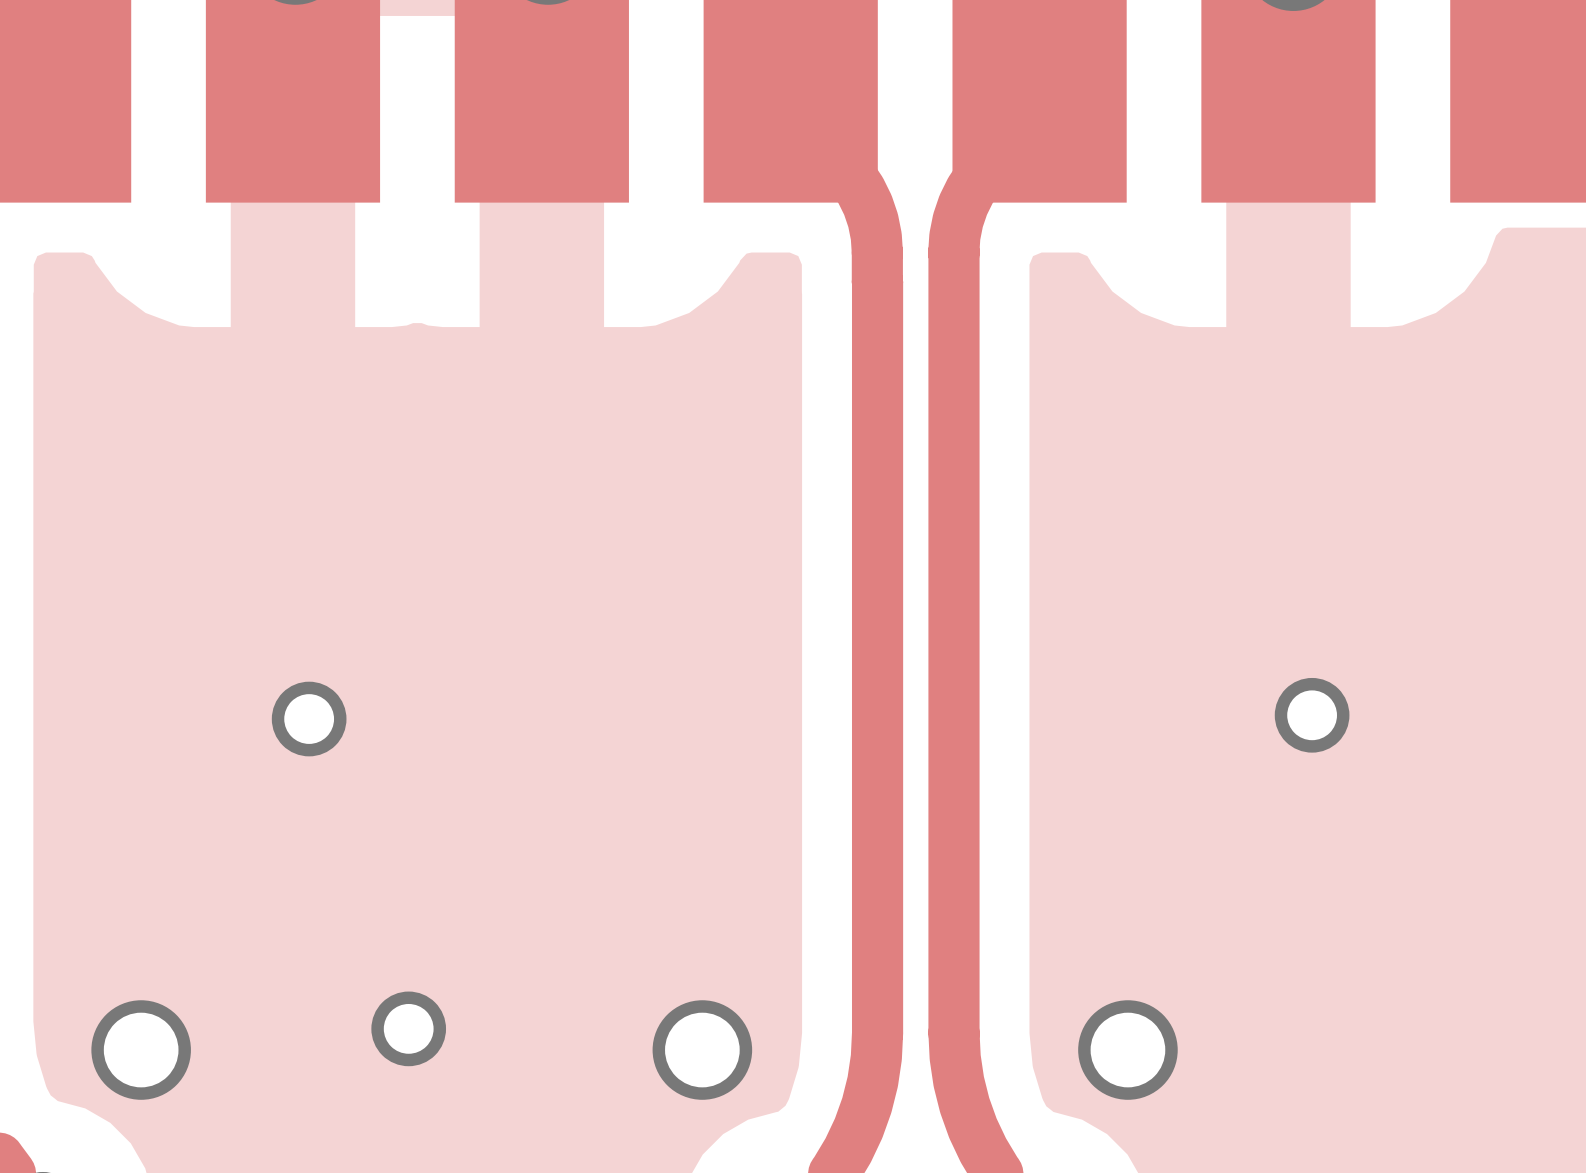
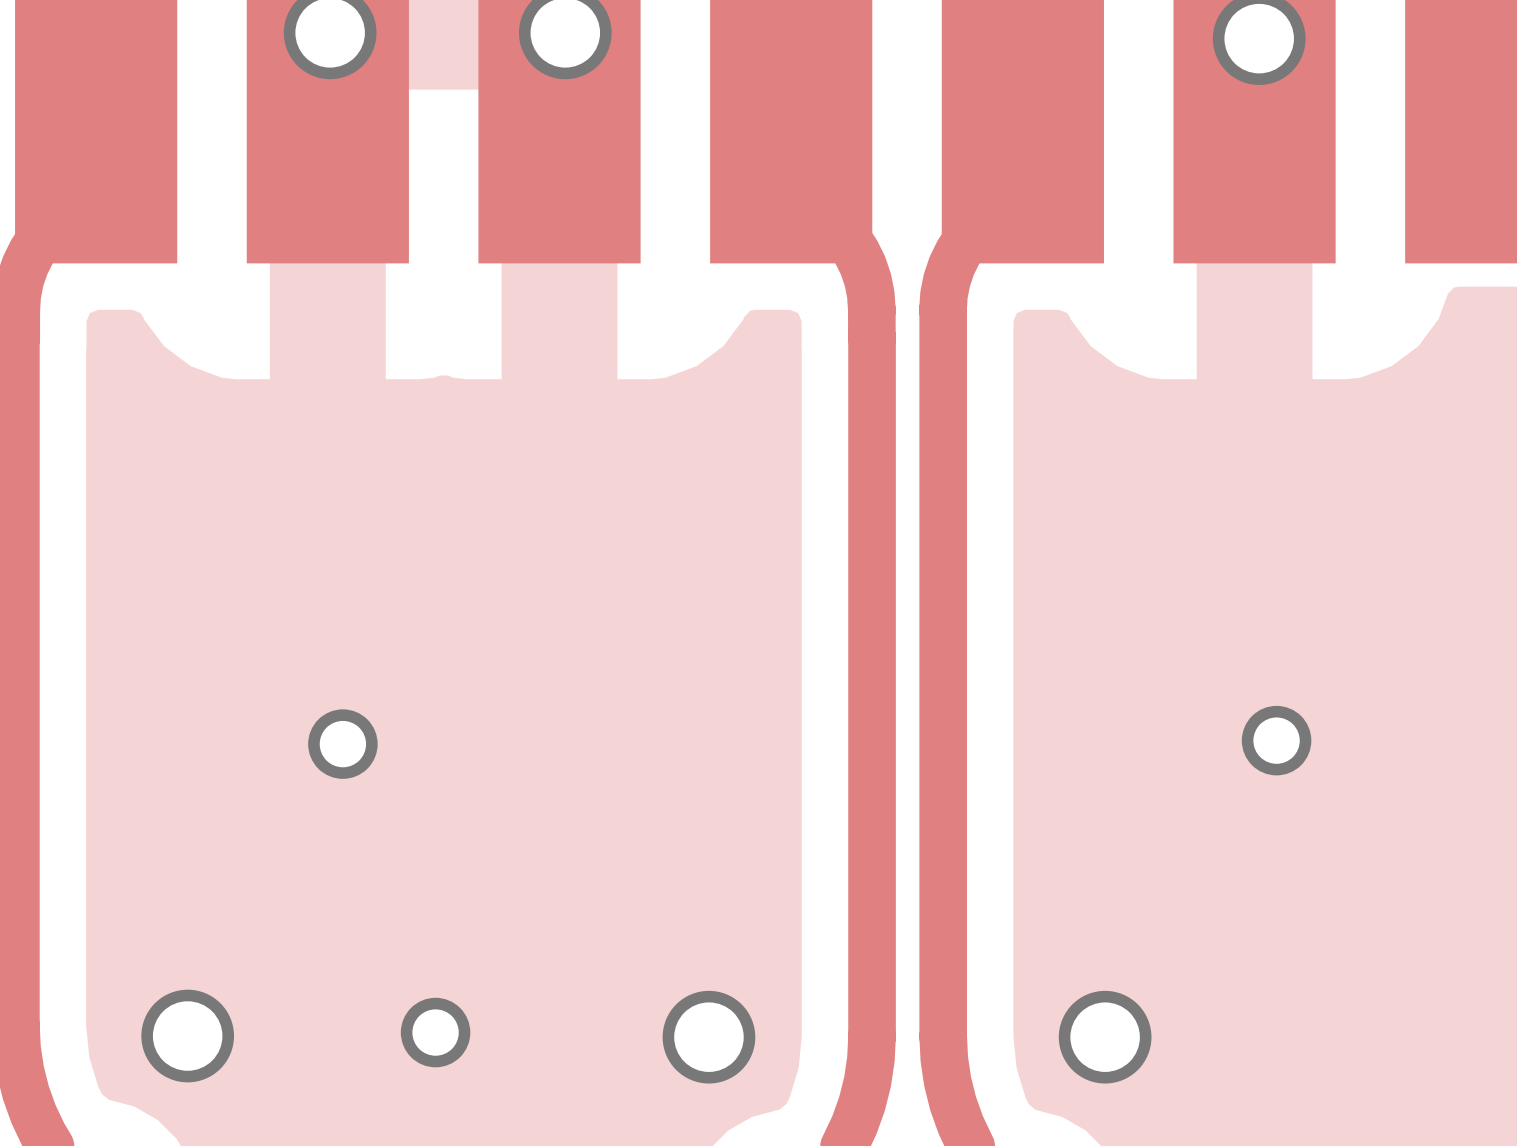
via position: (141, 1050) -> (187, 1036)
via position: (702, 1050) -> (708, 1037)
via position: (1127, 1050) -> (1105, 1037)

